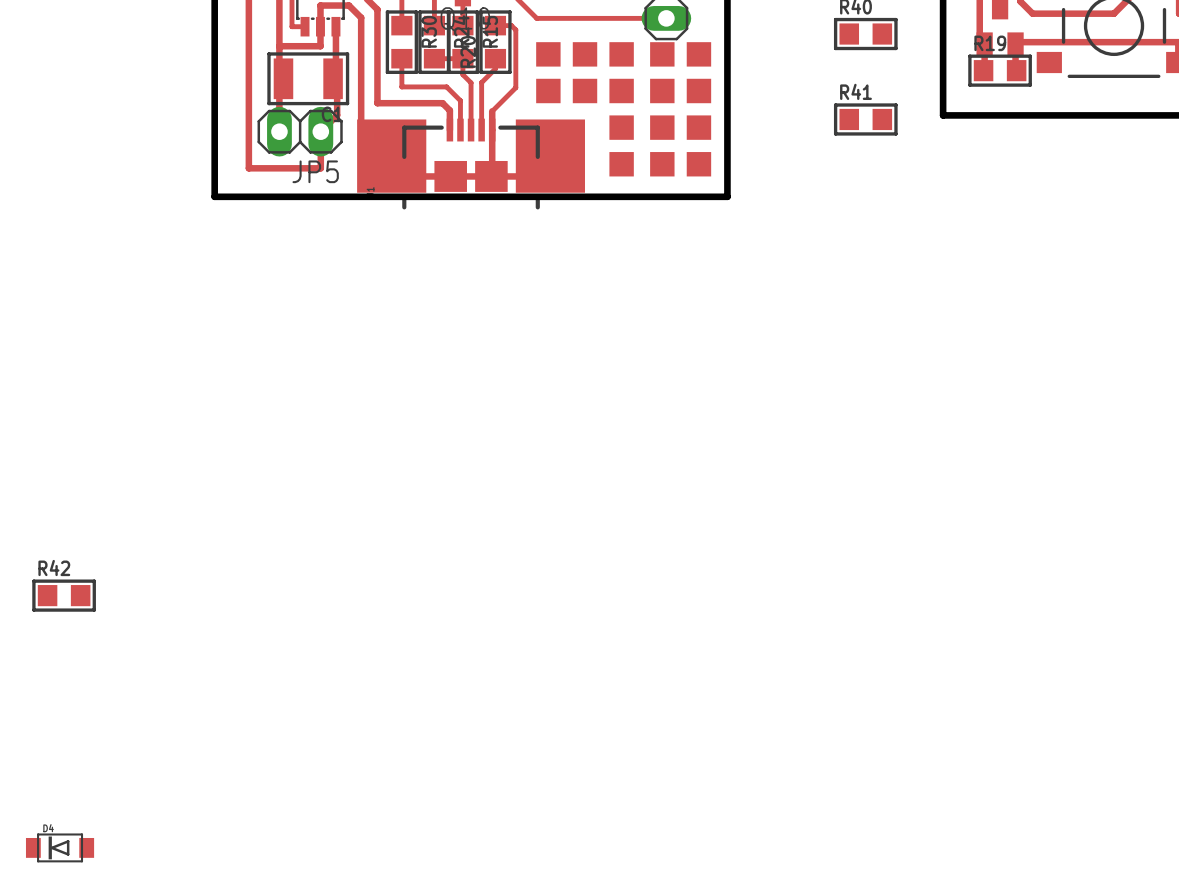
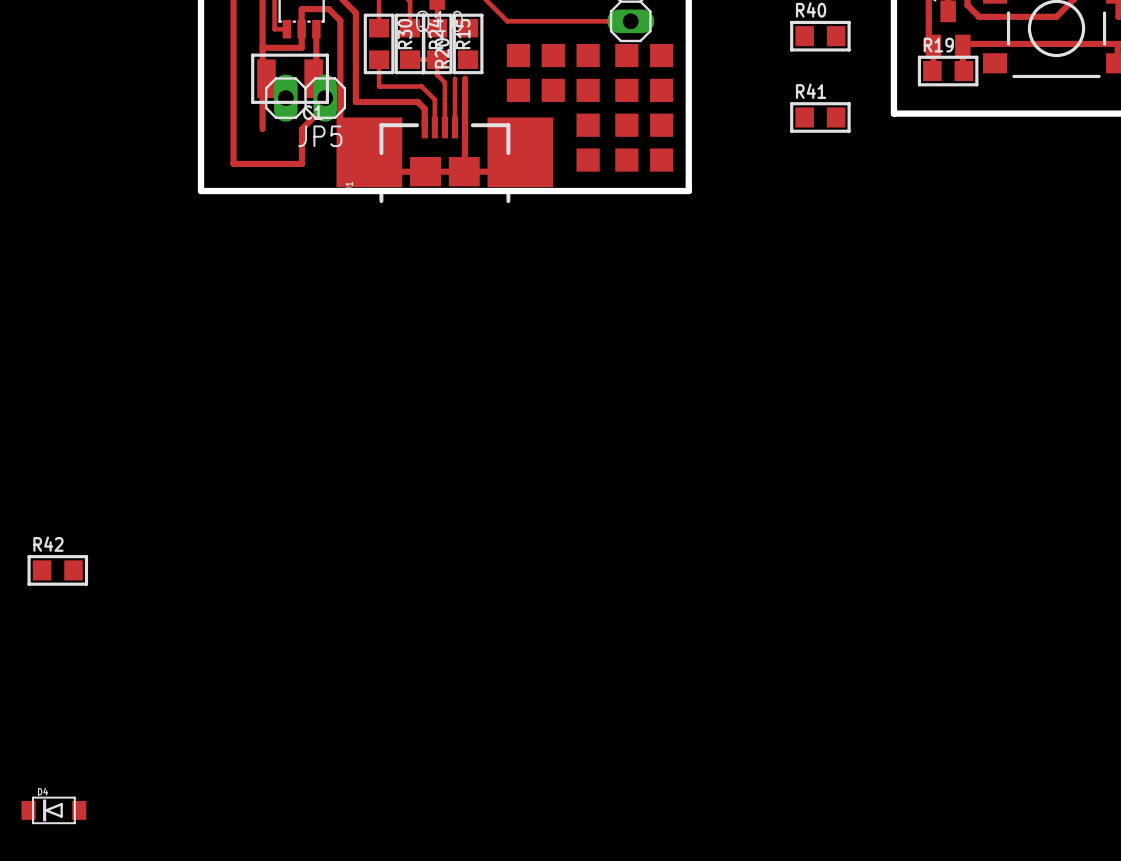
top track: (495, 25) (511, 25) (515, 29) (515, 87) (492, 111) -> (465, 78) (465, 109)
top track: (495, 58) (495, 68) (481, 82) -> (454, 78) (454, 82)
JP5 position: (300, 131) -> (305, 98)

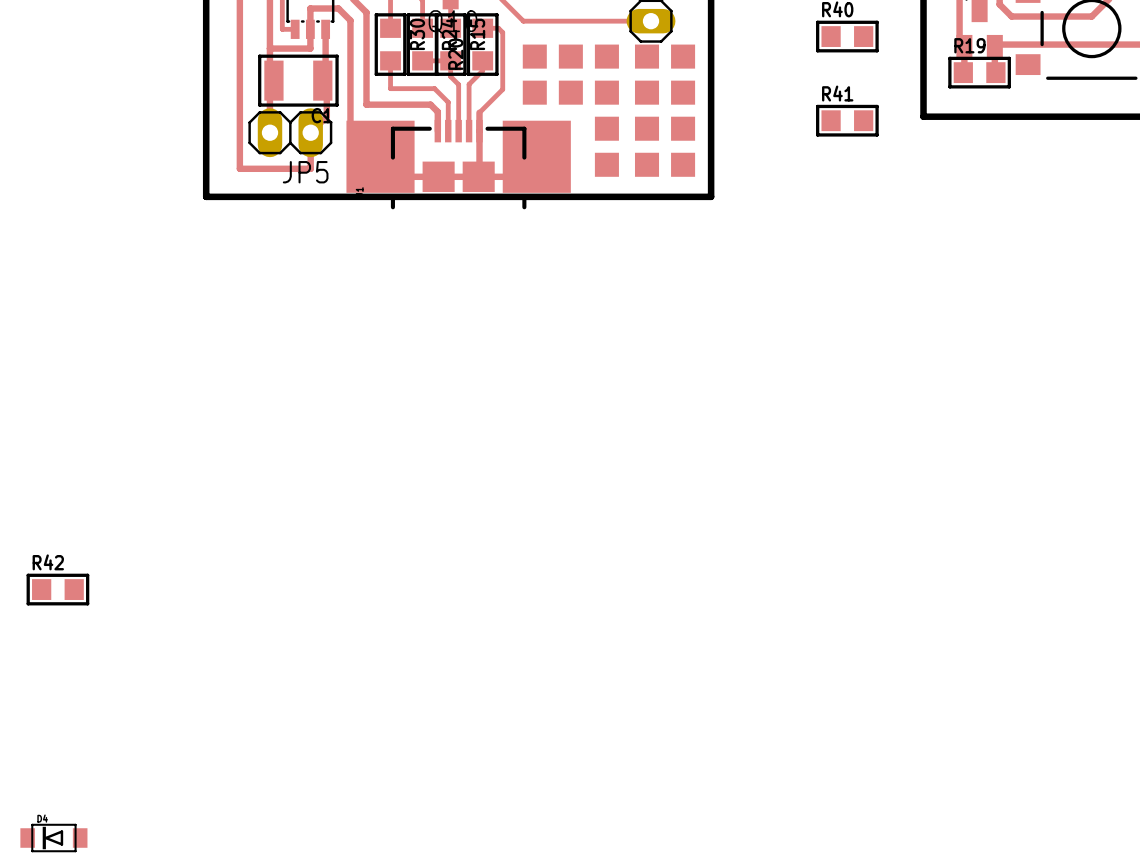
top track: (454, 78) (454, 82) -> (482, 60) (482, 70) (469, 84)
top track: (465, 78) (465, 109) -> (482, 28) (498, 28) (502, 32) (502, 89) (479, 112)
JP5 position: (305, 98) -> (290, 132)

